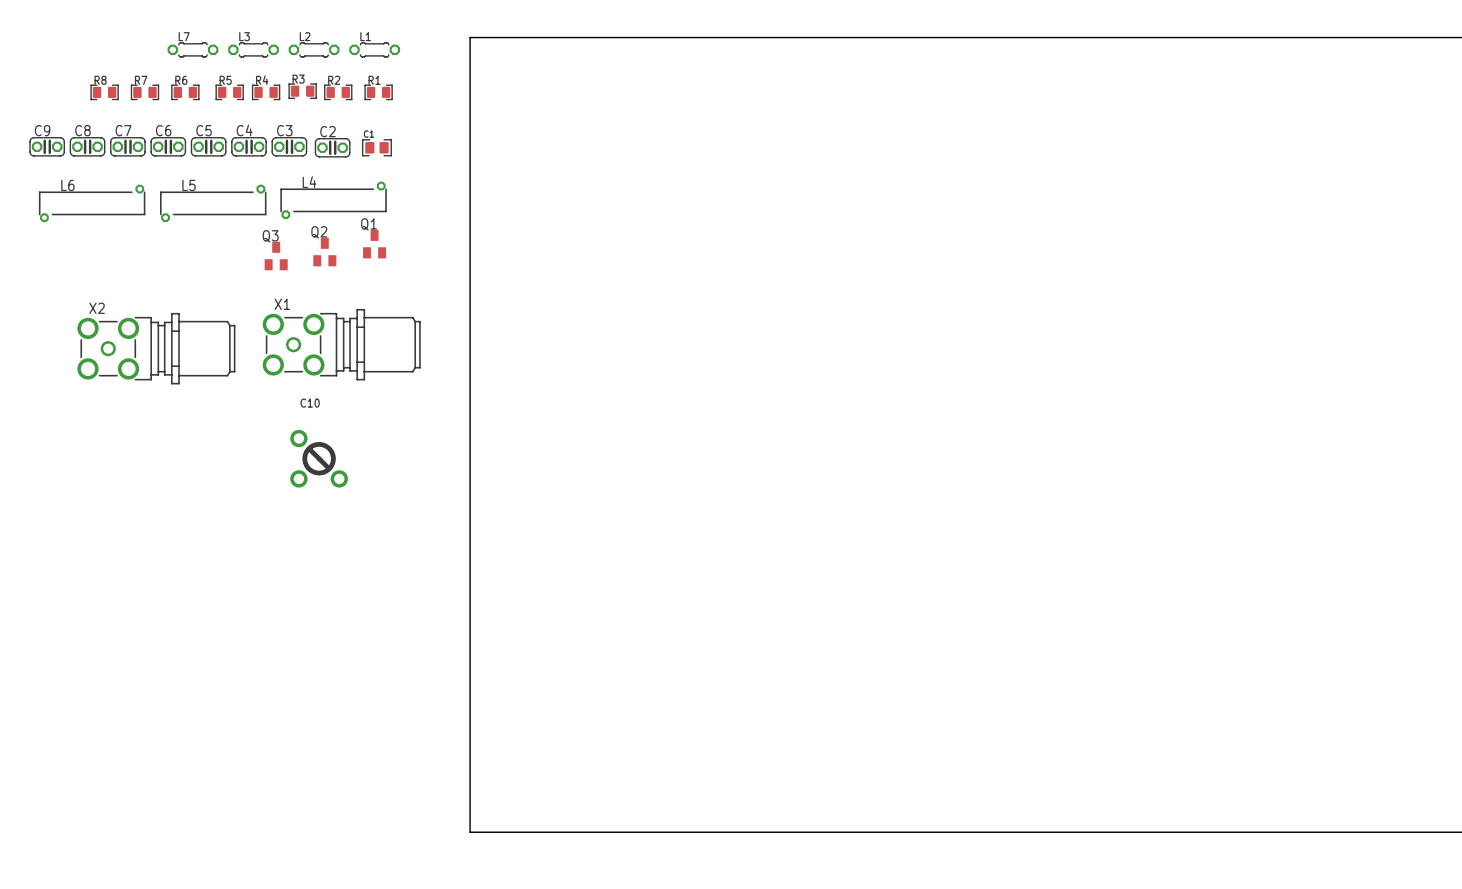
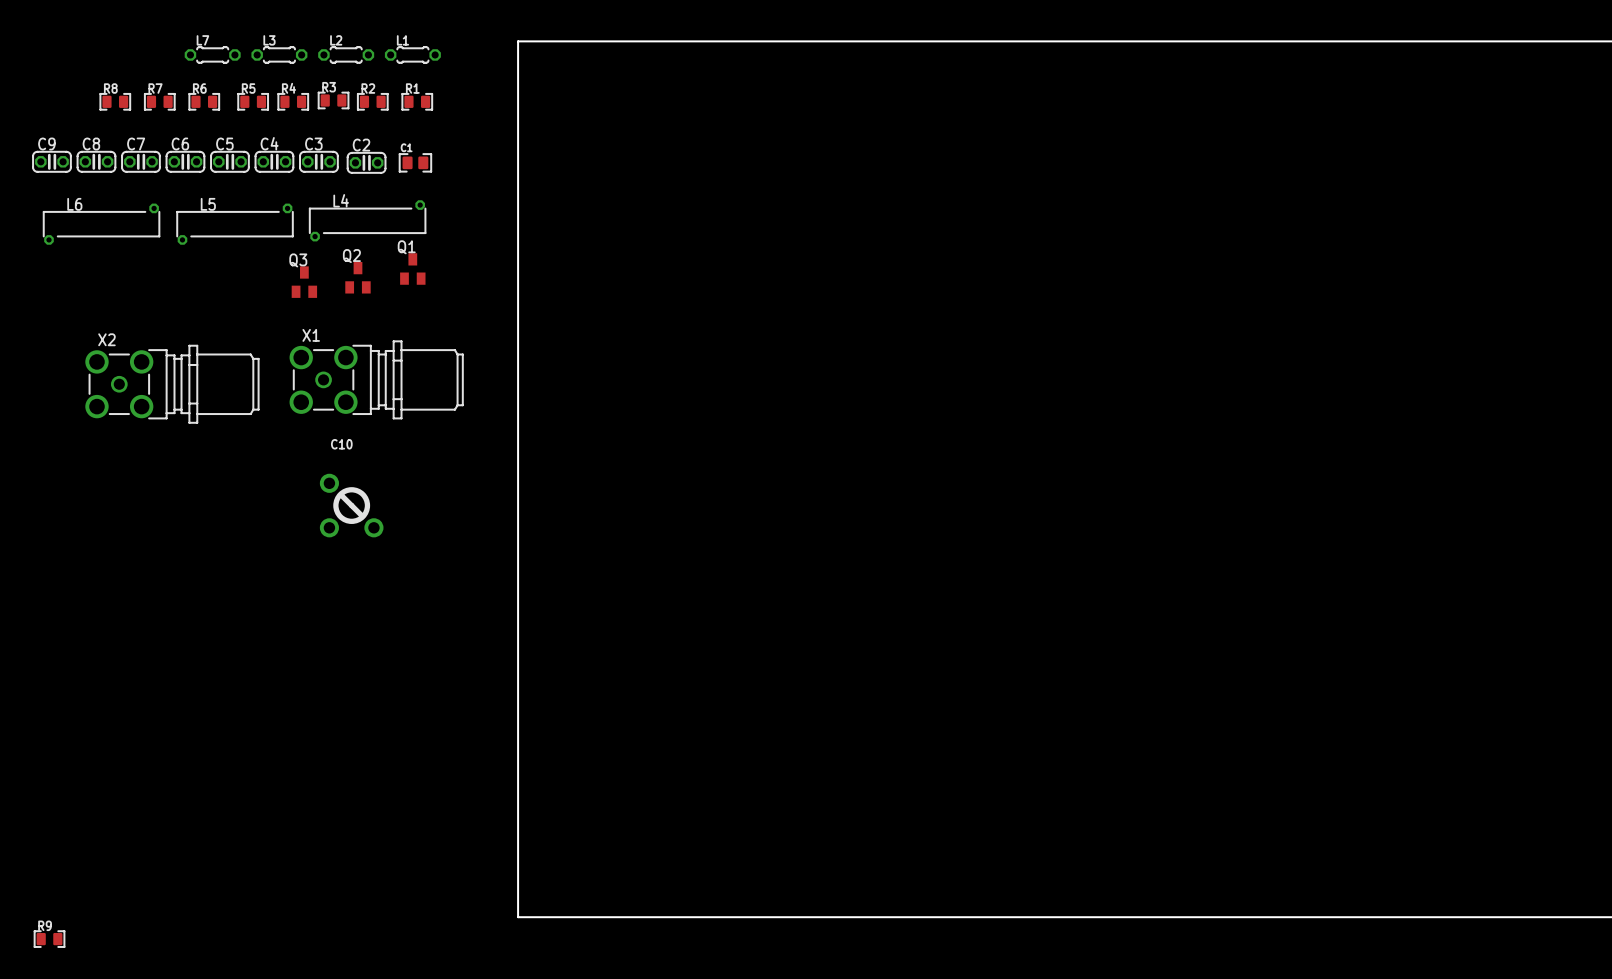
R9: none -> (49, 939)

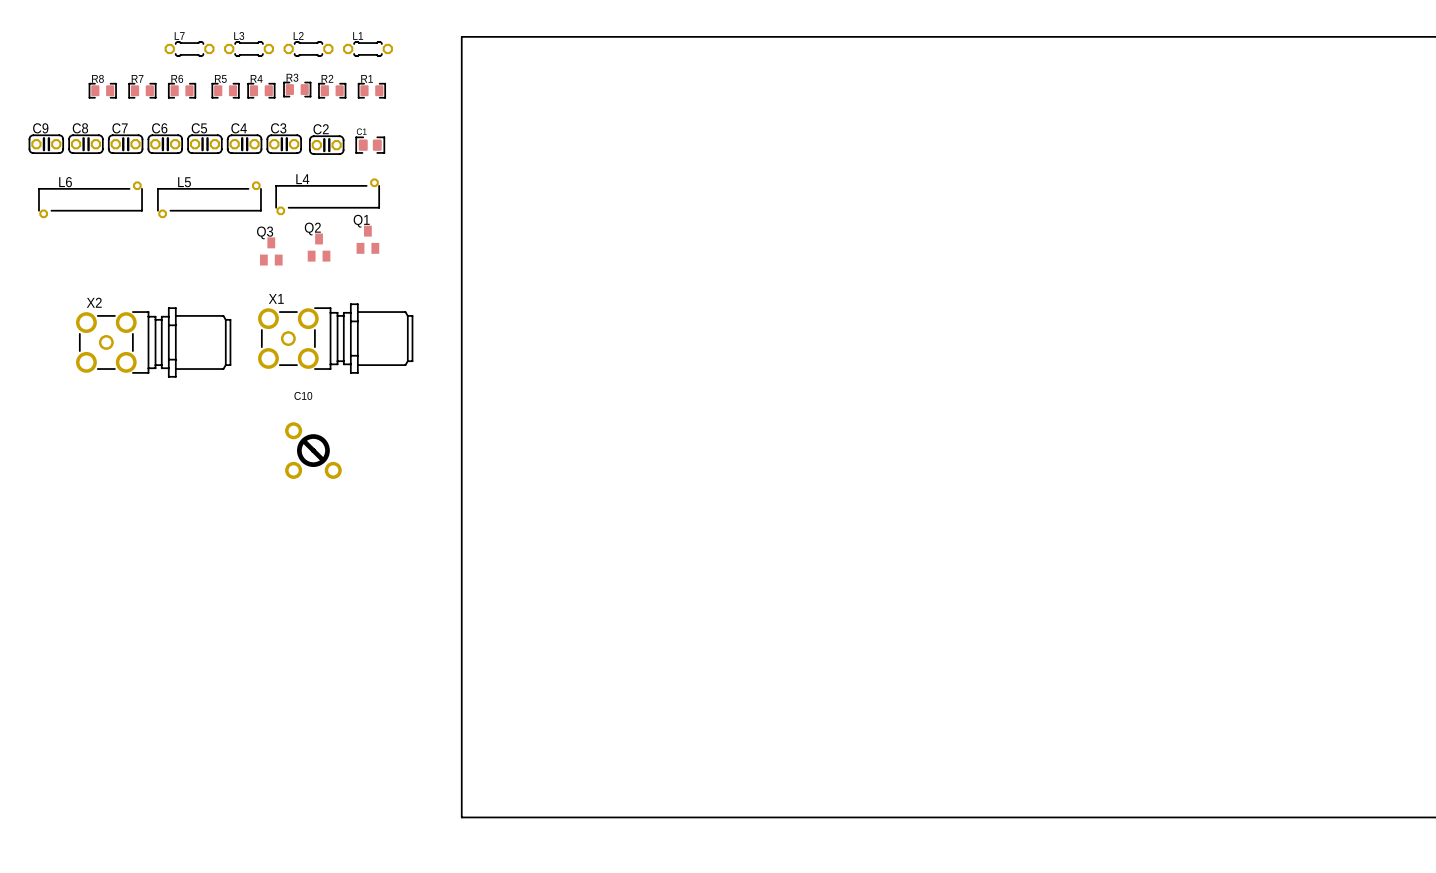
R9: (49, 939) -> none

